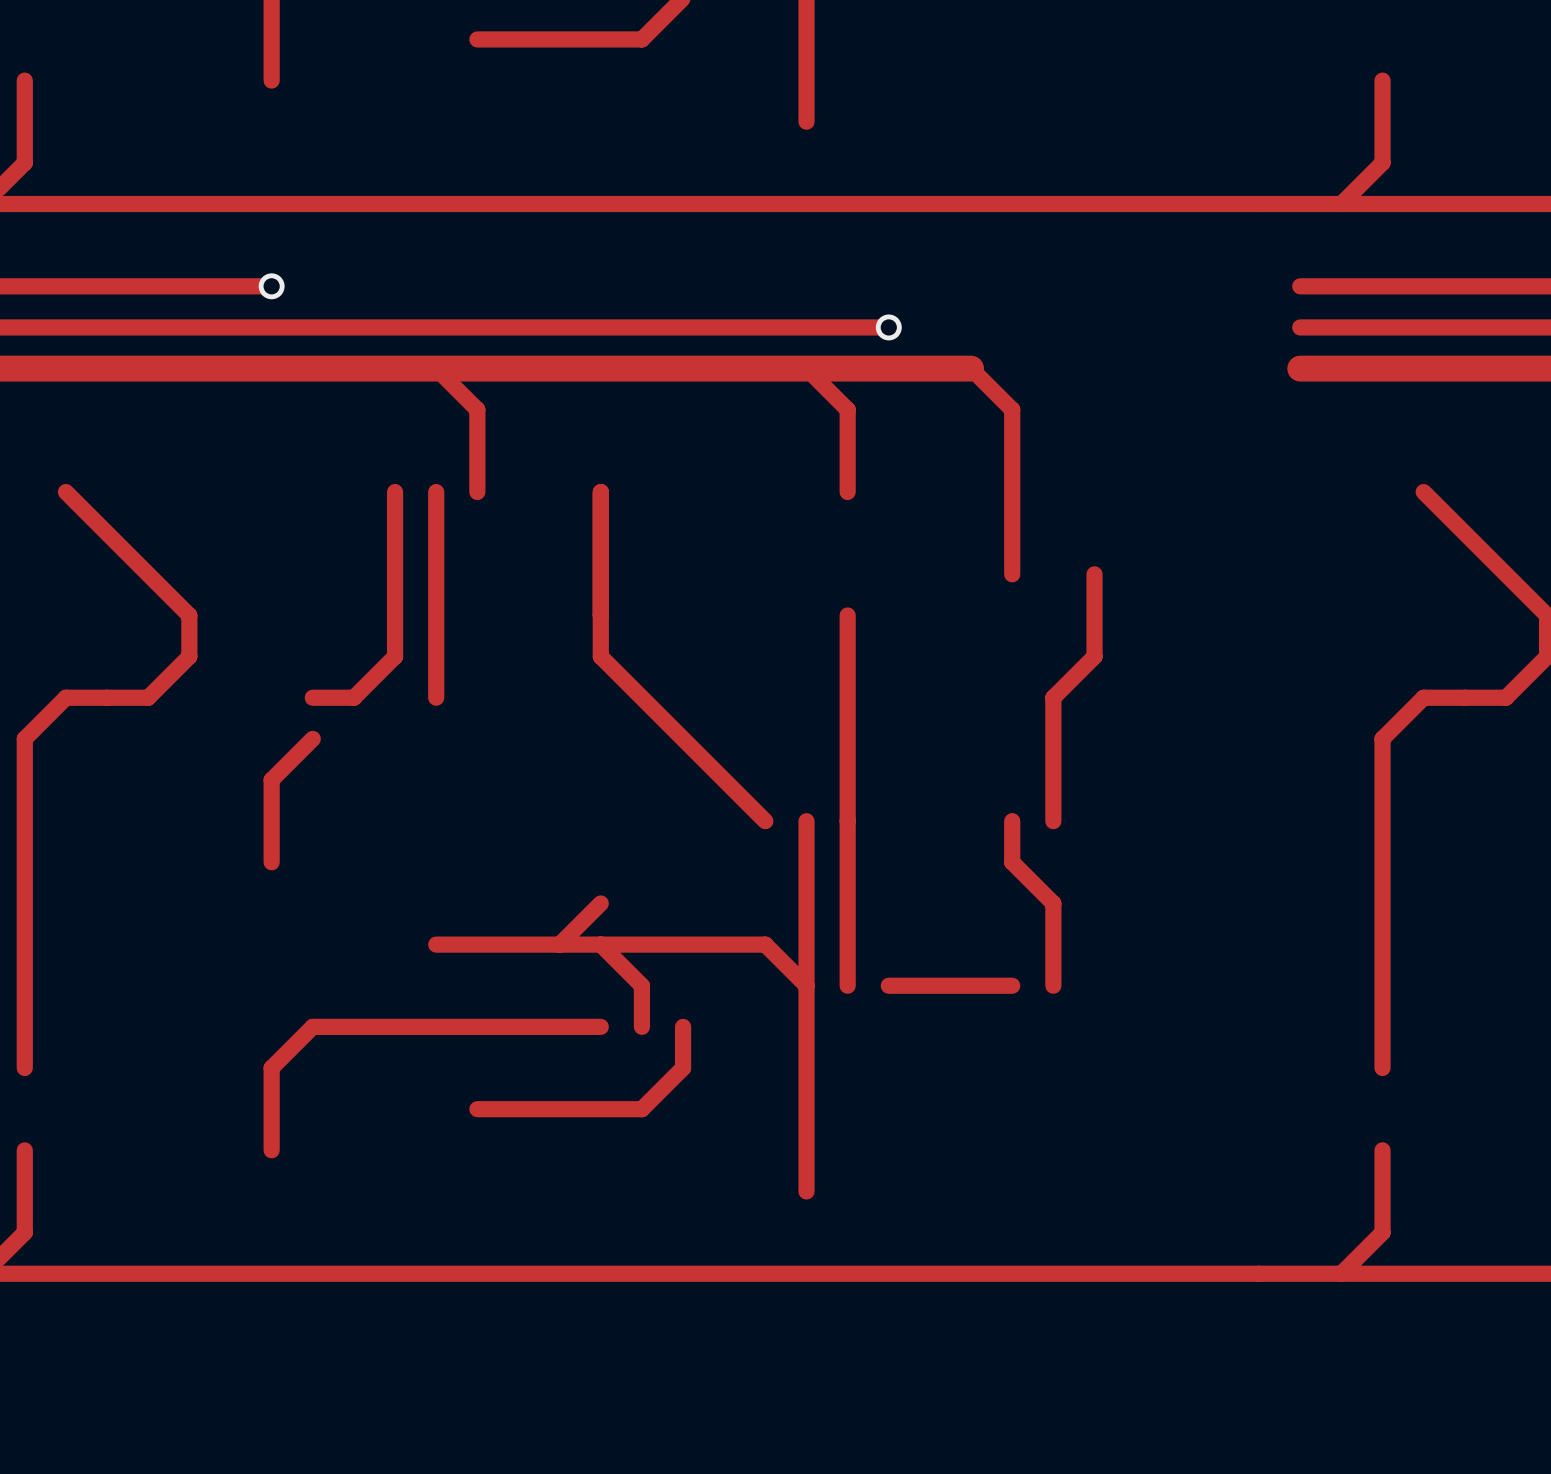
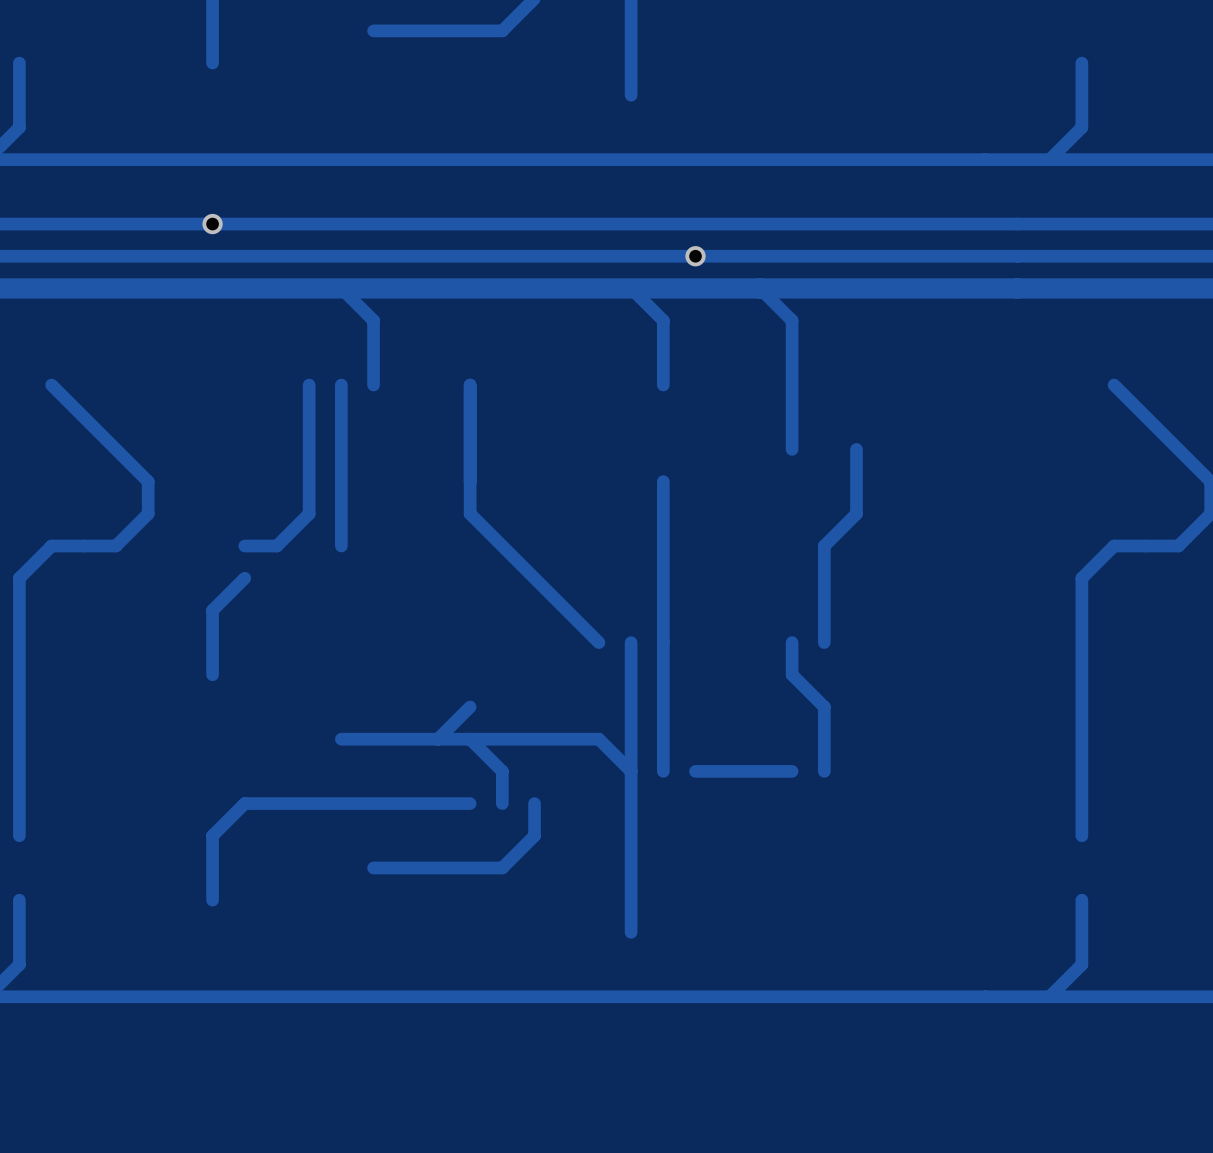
track: none -> (212, 224) (1017, 224)
track: none -> (695, 256) (1017, 256)
track: none -> (759, 288) (1017, 288)

